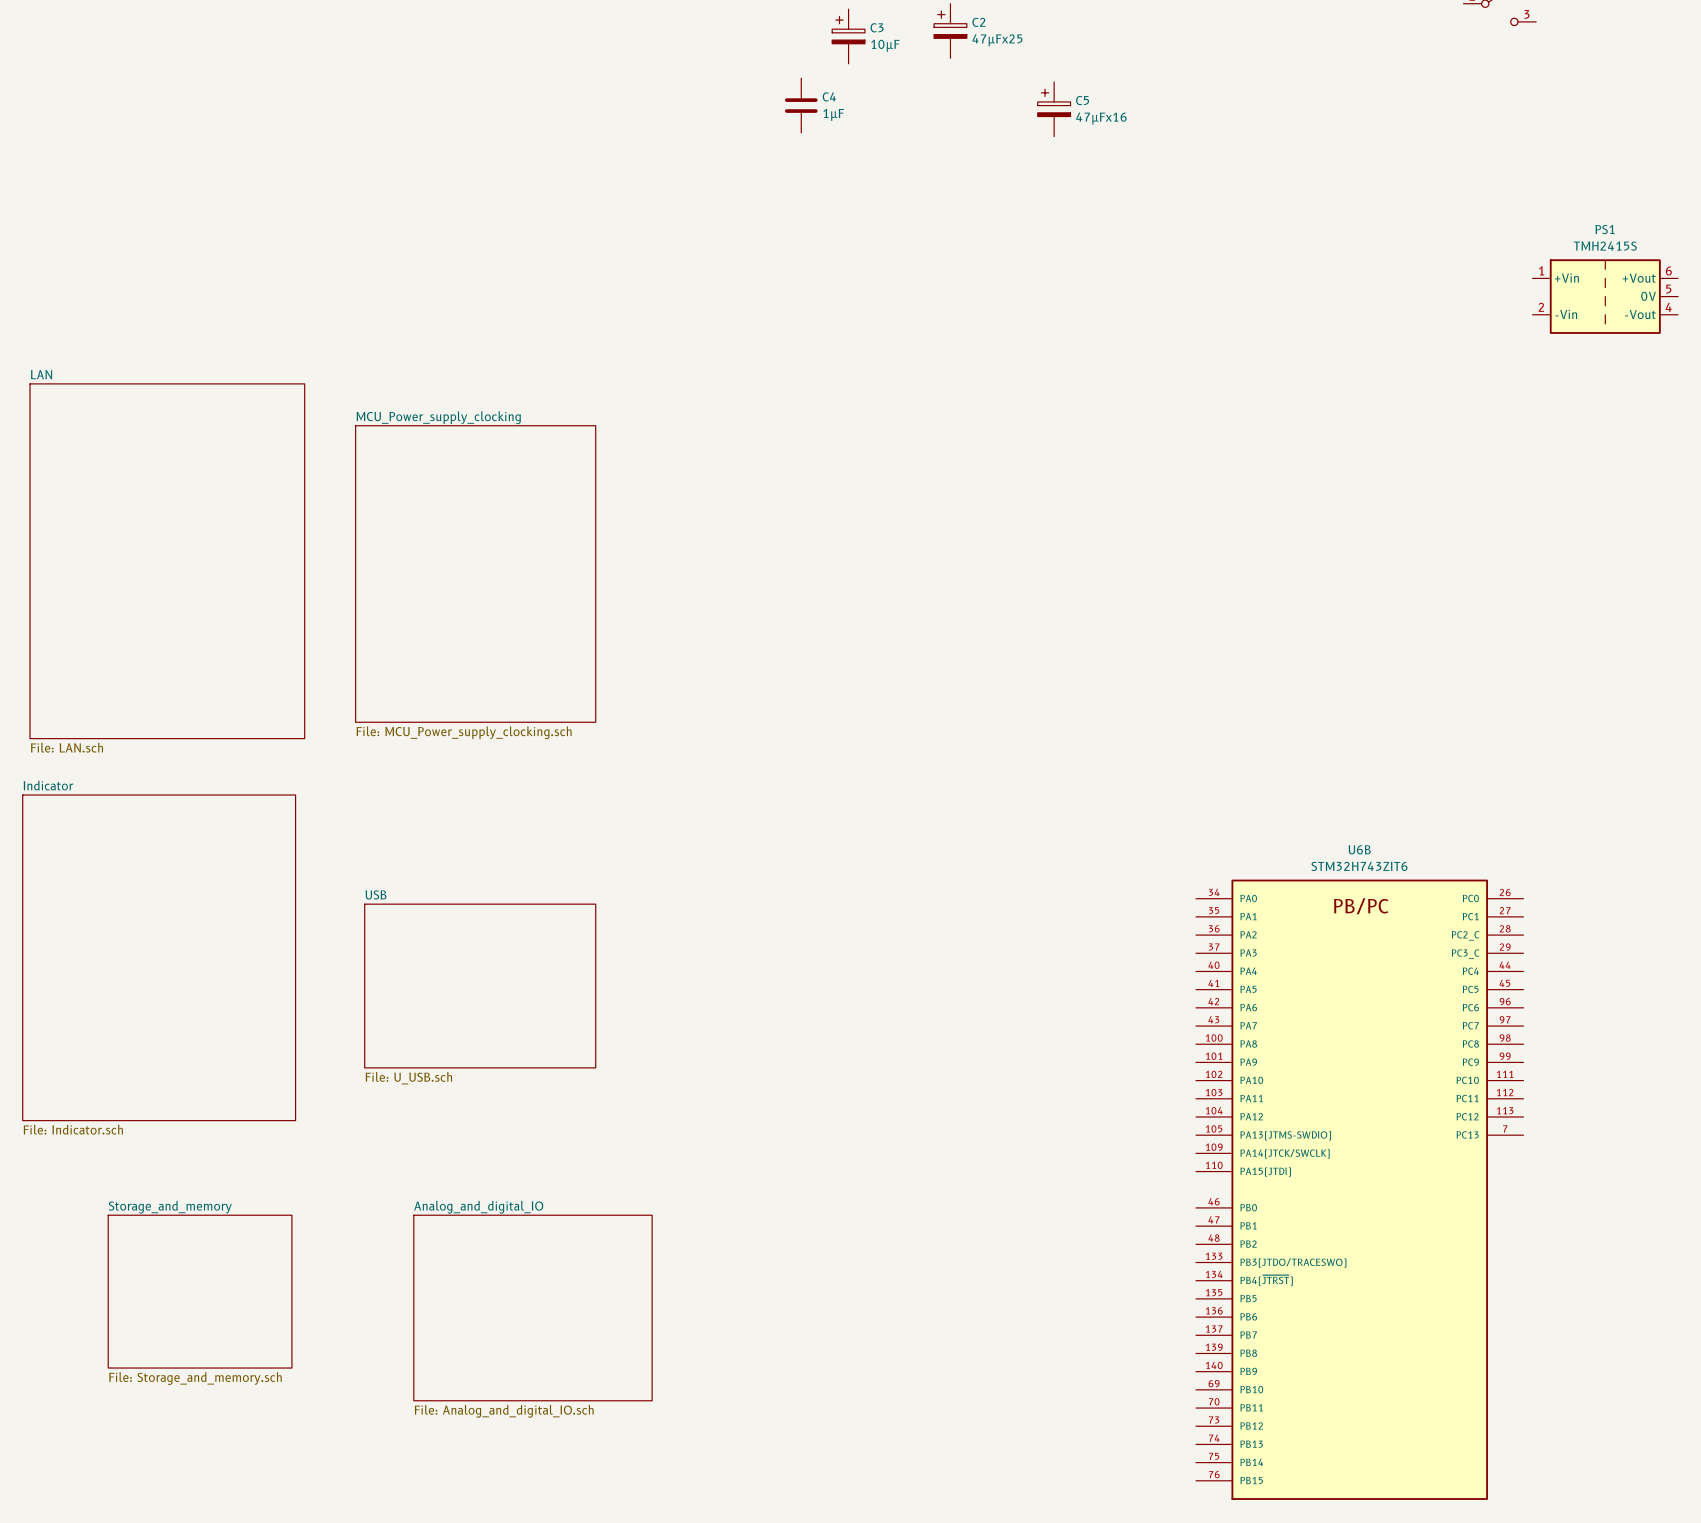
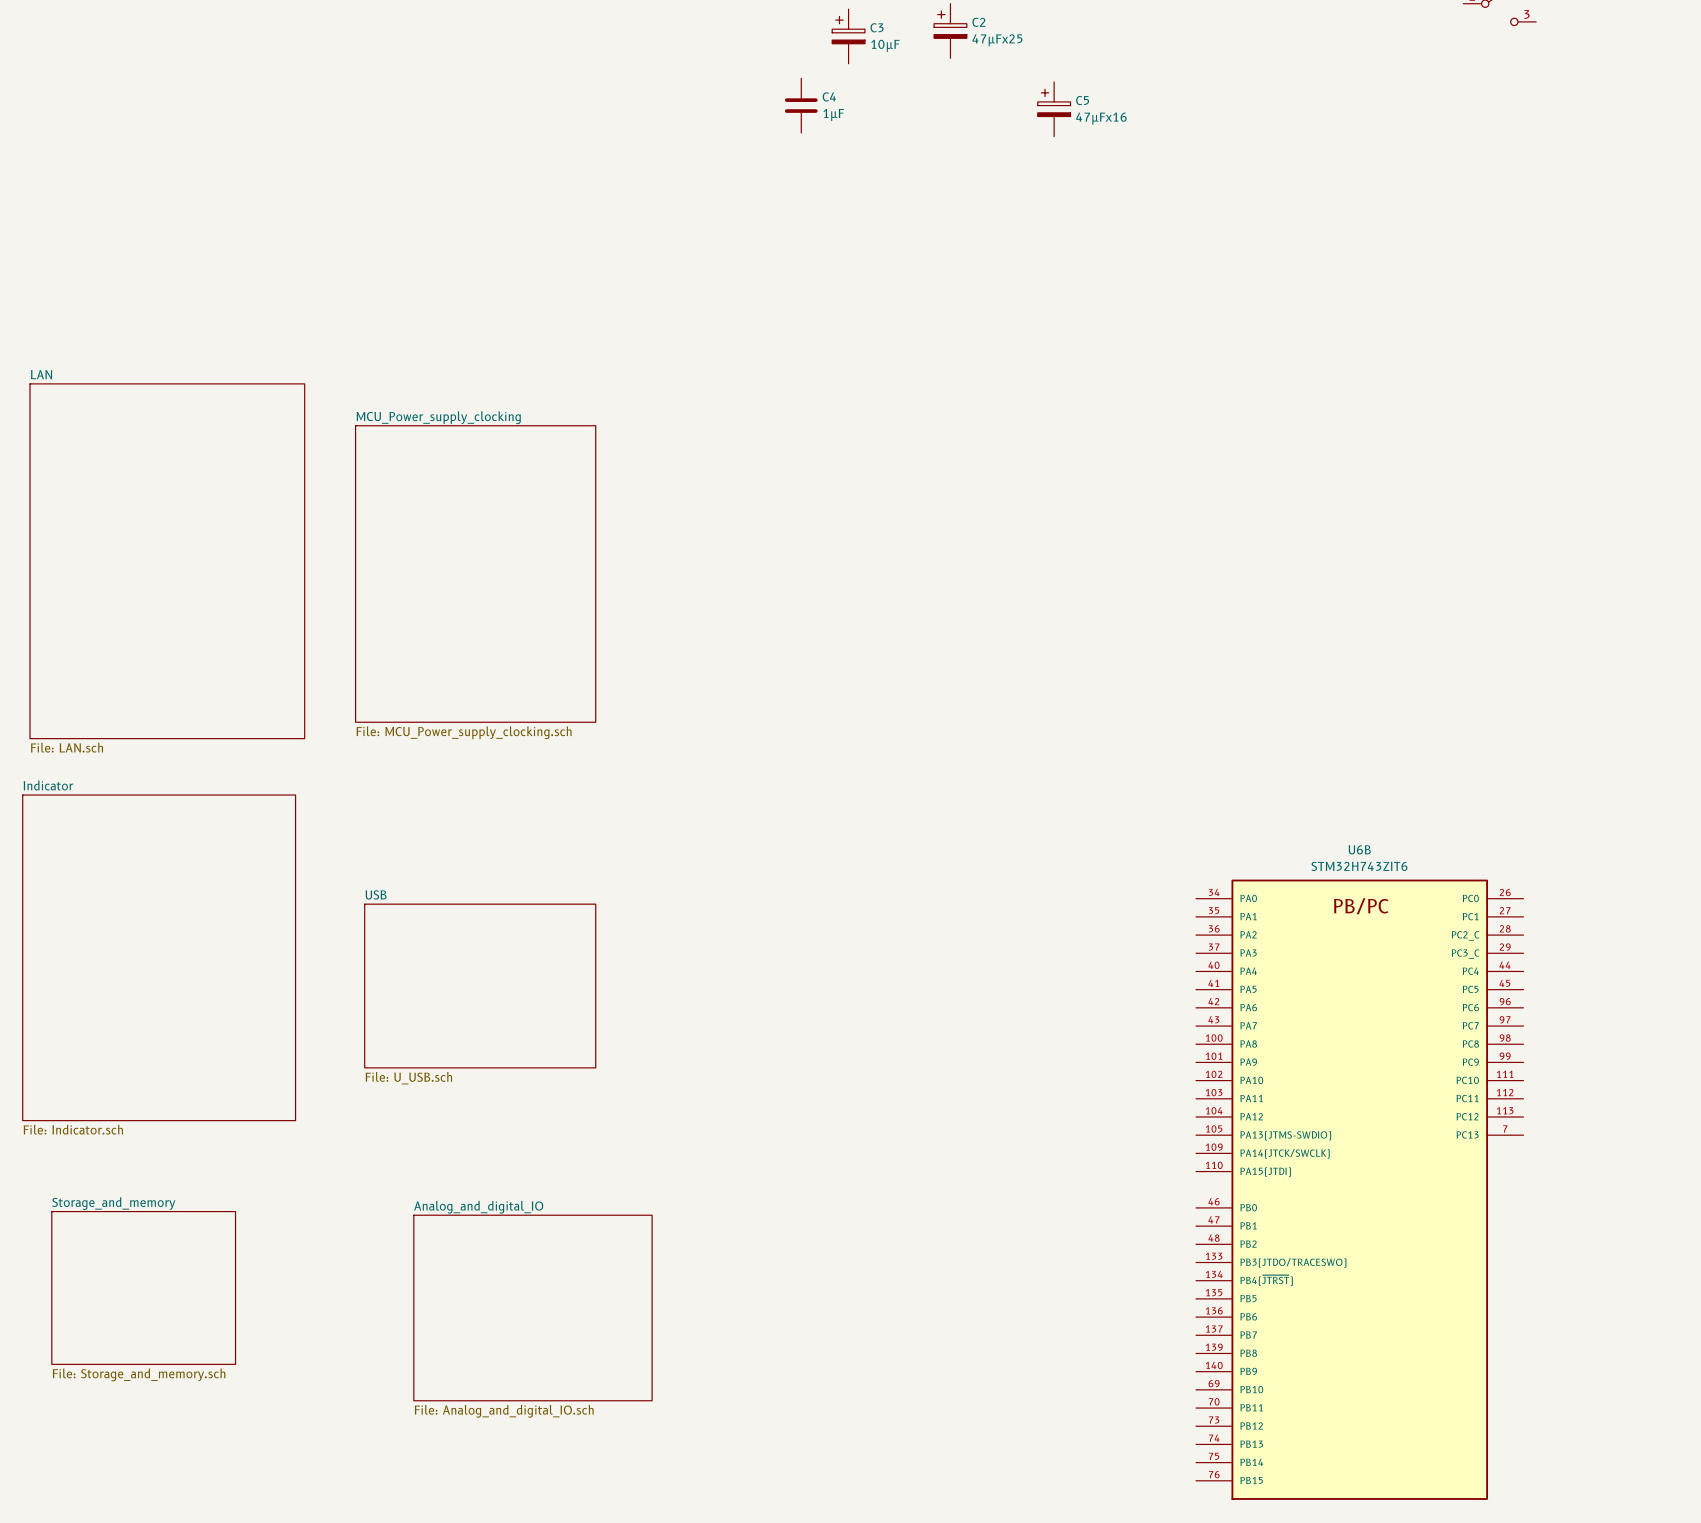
PS1: TMH2415S (1605, 296) -> none
sheet Storage_and_memory position: (200, 1291) -> (143, 1287)

